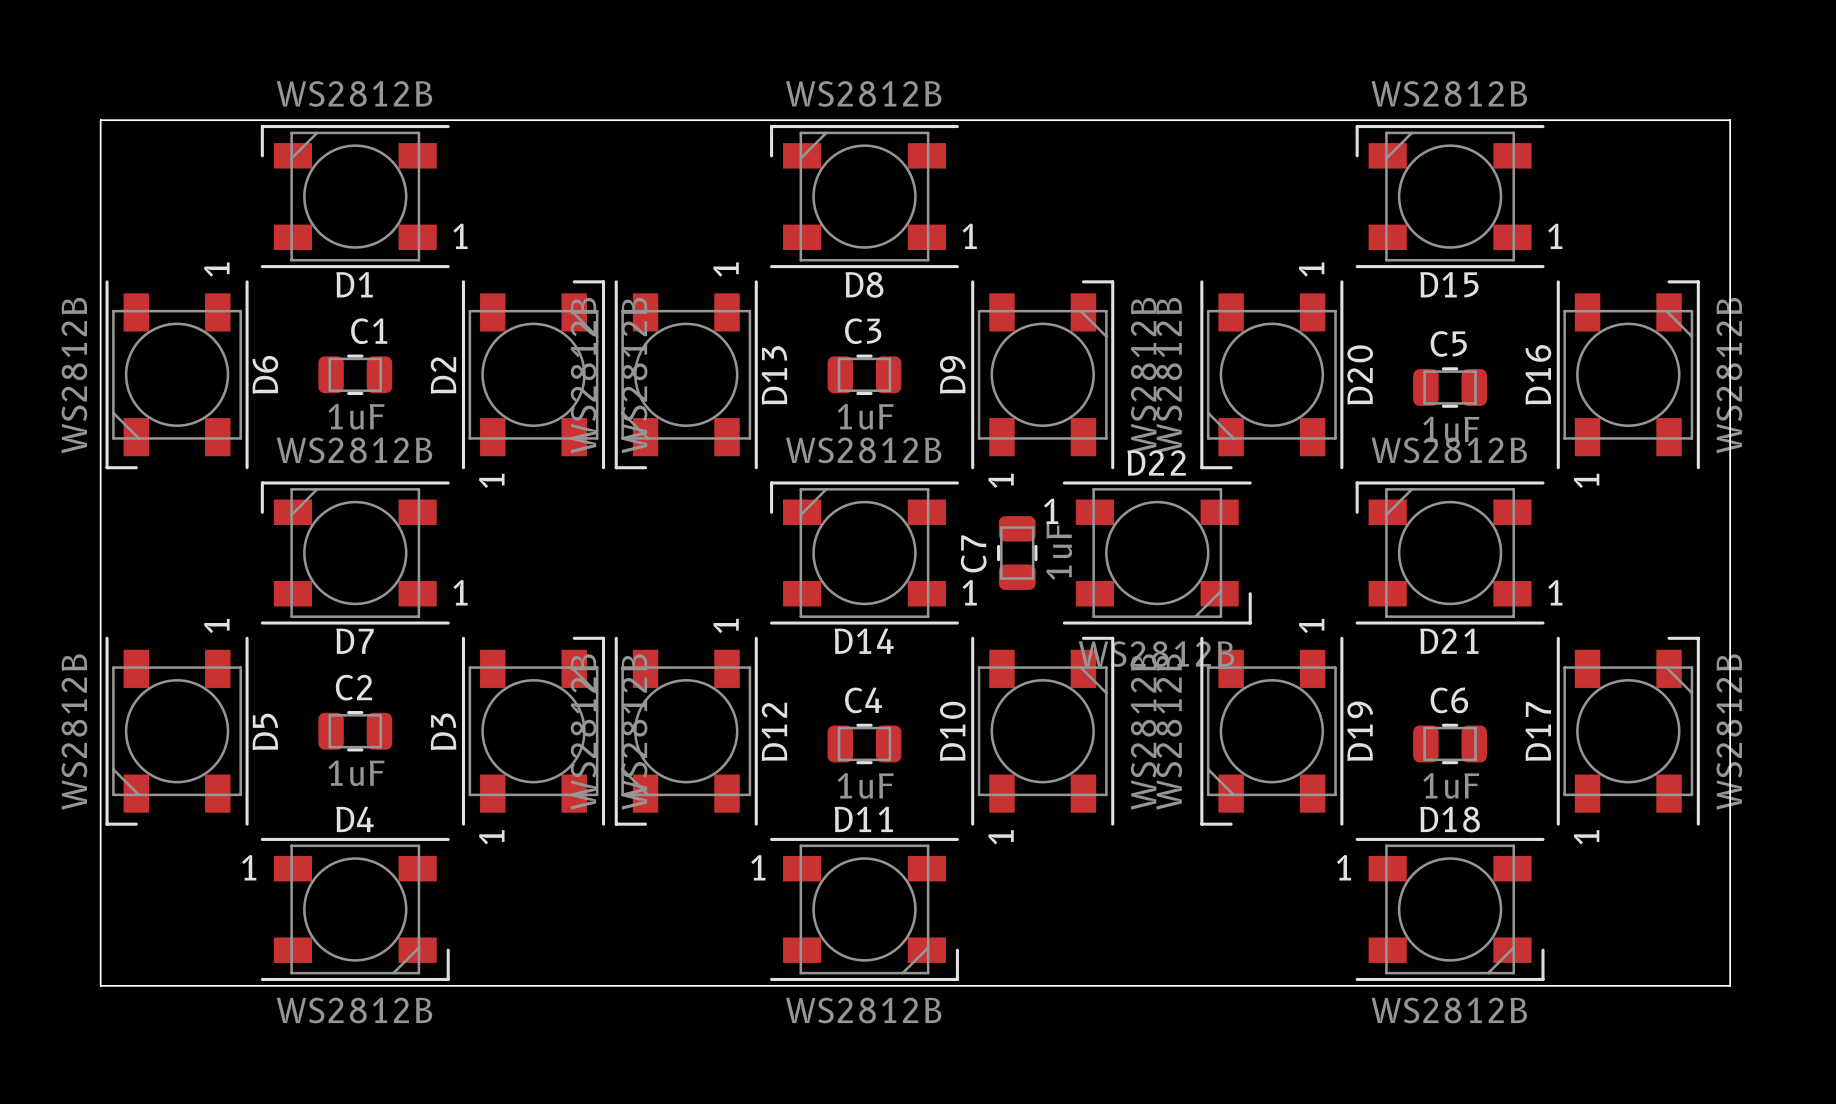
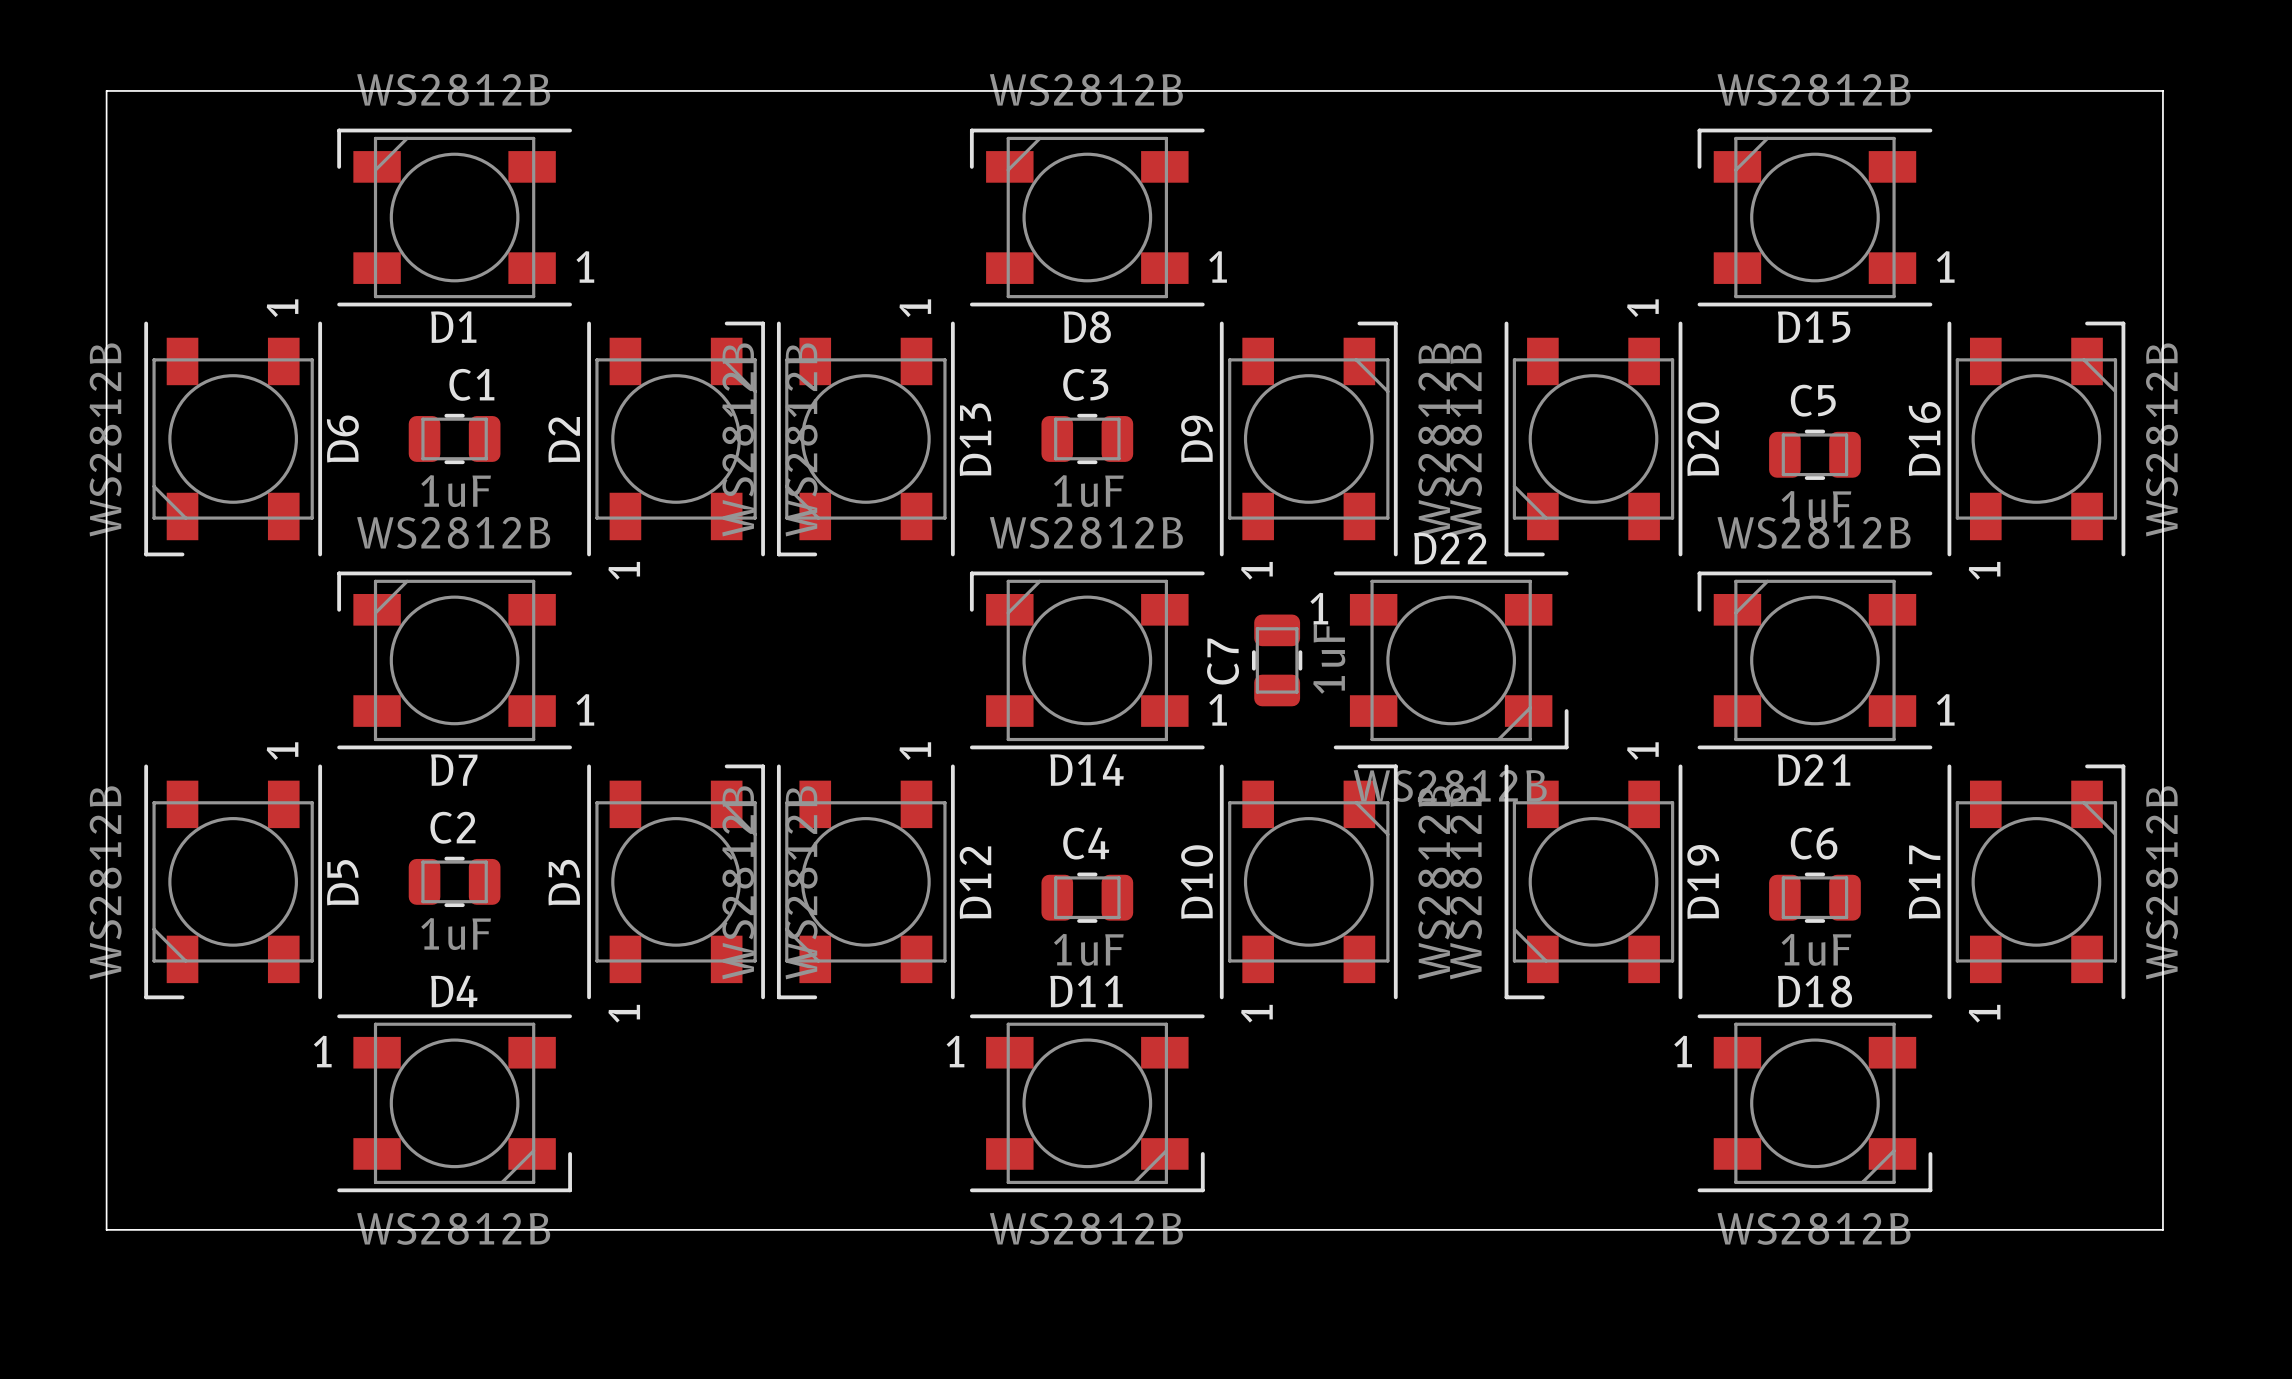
board edge: (1730, 120) (100, 120) (100, 985) (1730, 985) -> (2162, 122) (2162, 90) (106, 90) (106, 1229) (2162, 1229) (2162, 1198)

